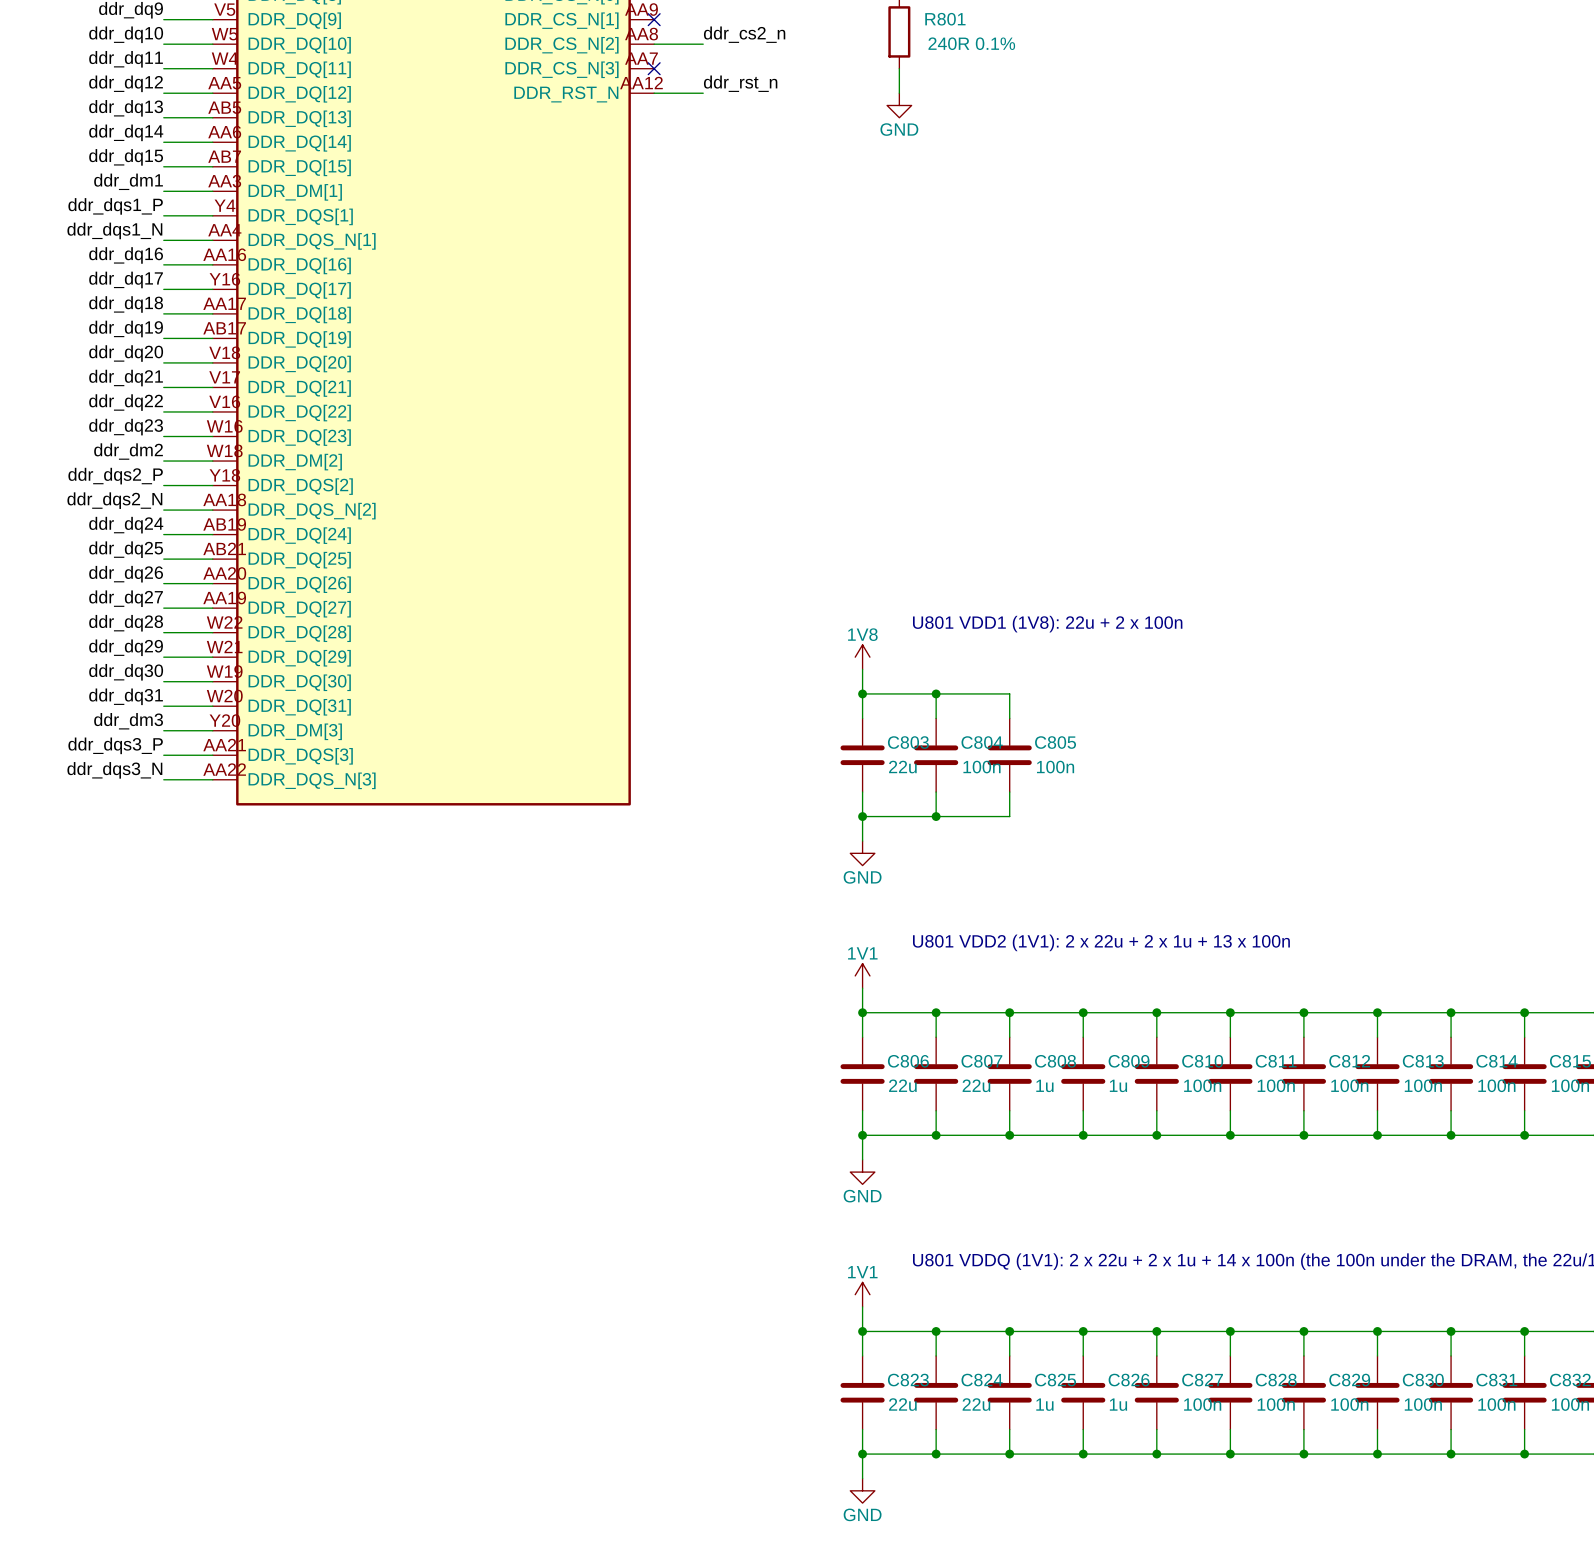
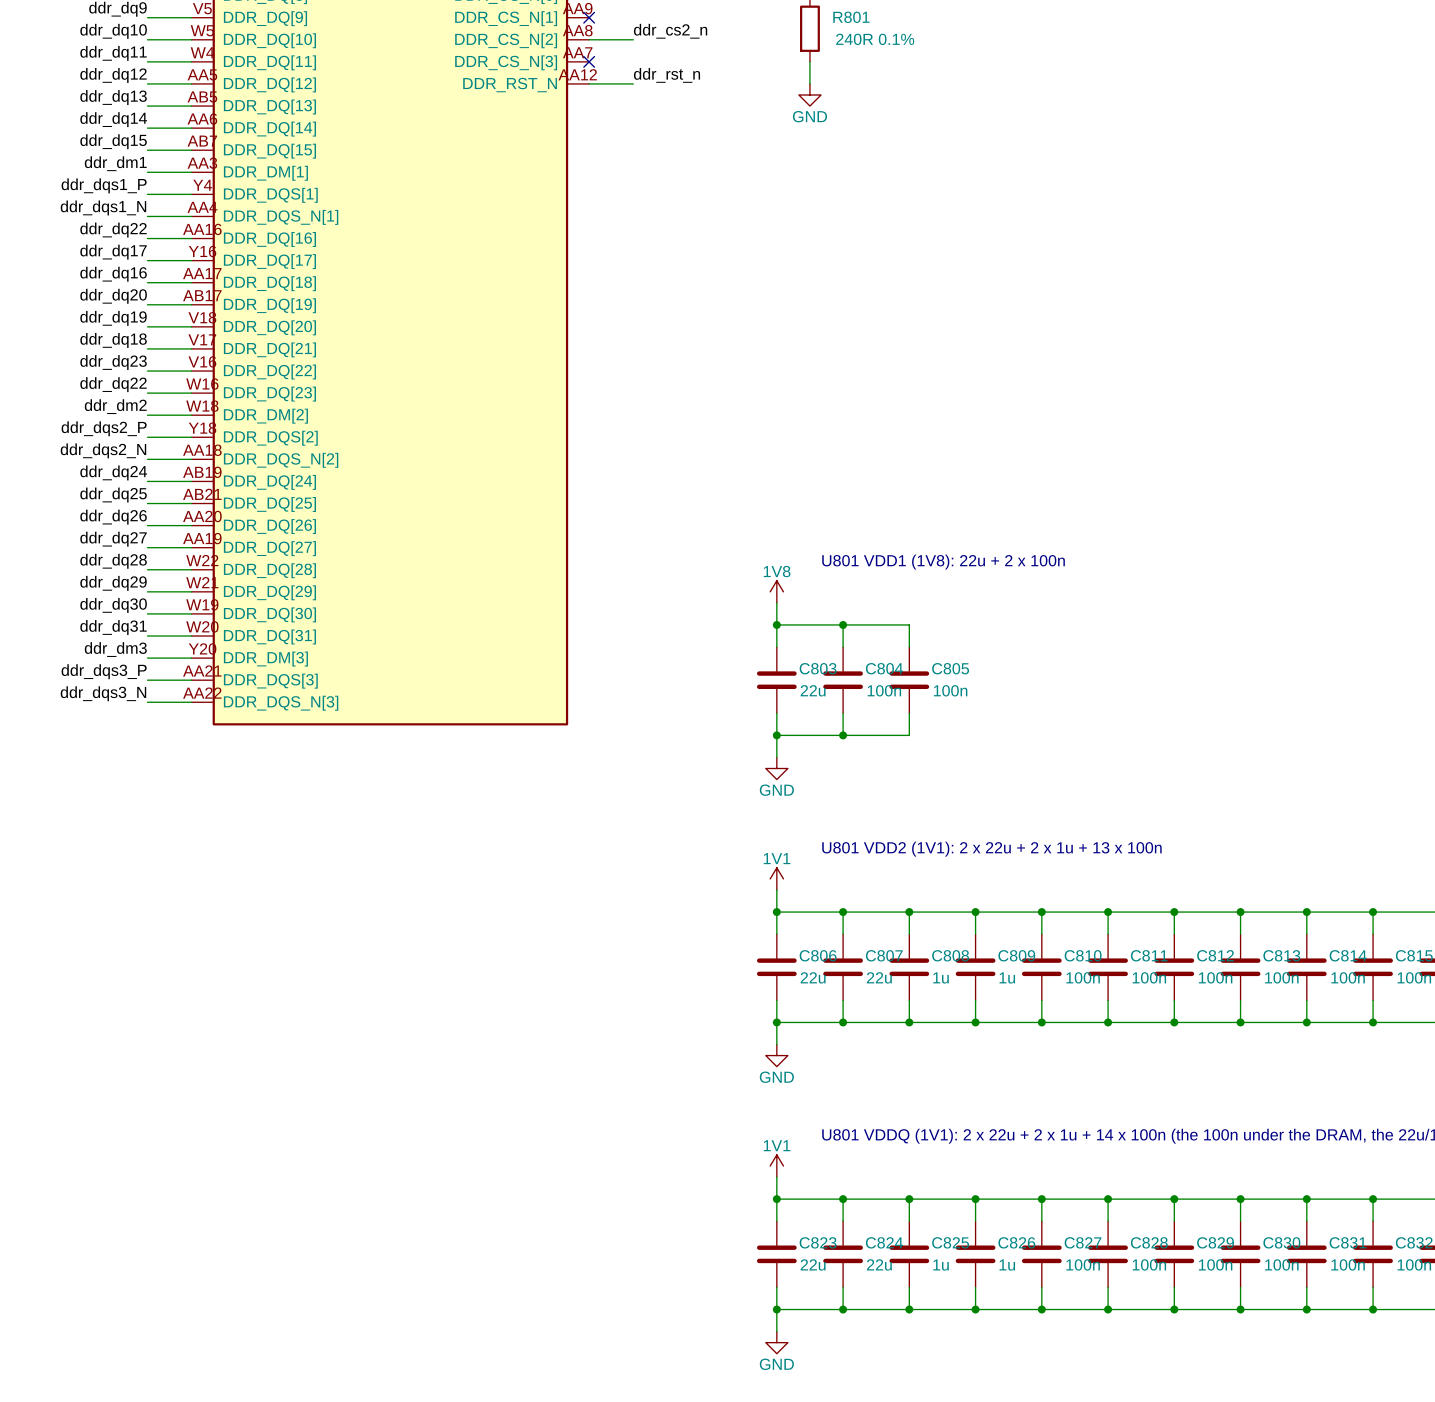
label: ddr_dq16 (126, 255) -> ddr_dq22 (113, 230)
label: ddr_dq18 (126, 304) -> ddr_dq16 (113, 274)
label: ddr_dq19 (126, 329) -> ddr_dq20 (113, 296)
label: ddr_dq20 (126, 353) -> ddr_dq19 (113, 318)
label: ddr_dq21 (126, 378) -> ddr_dq18 (113, 340)
label: ddr_dq22 (126, 402) -> ddr_dq23 (113, 362)
label: ddr_dq23 (126, 427) -> ddr_dq22 (113, 384)

